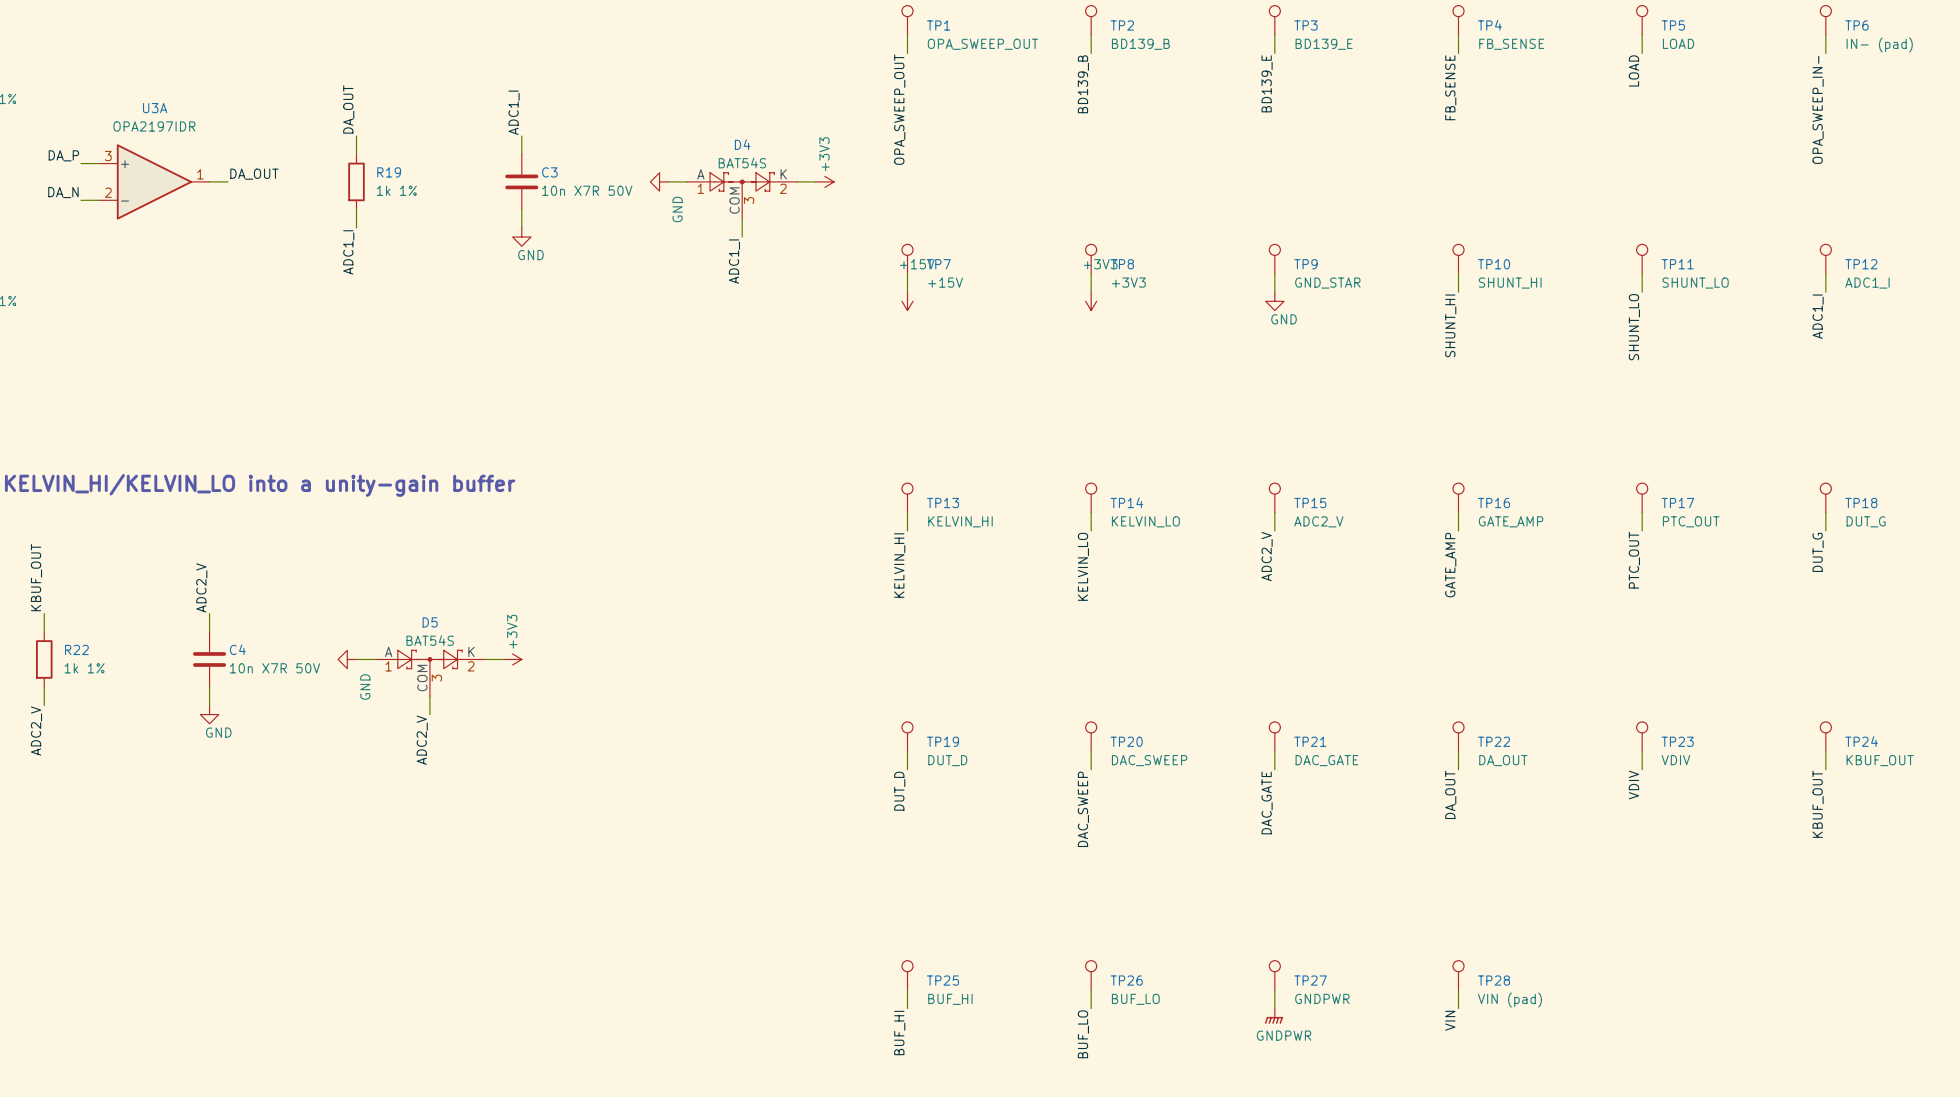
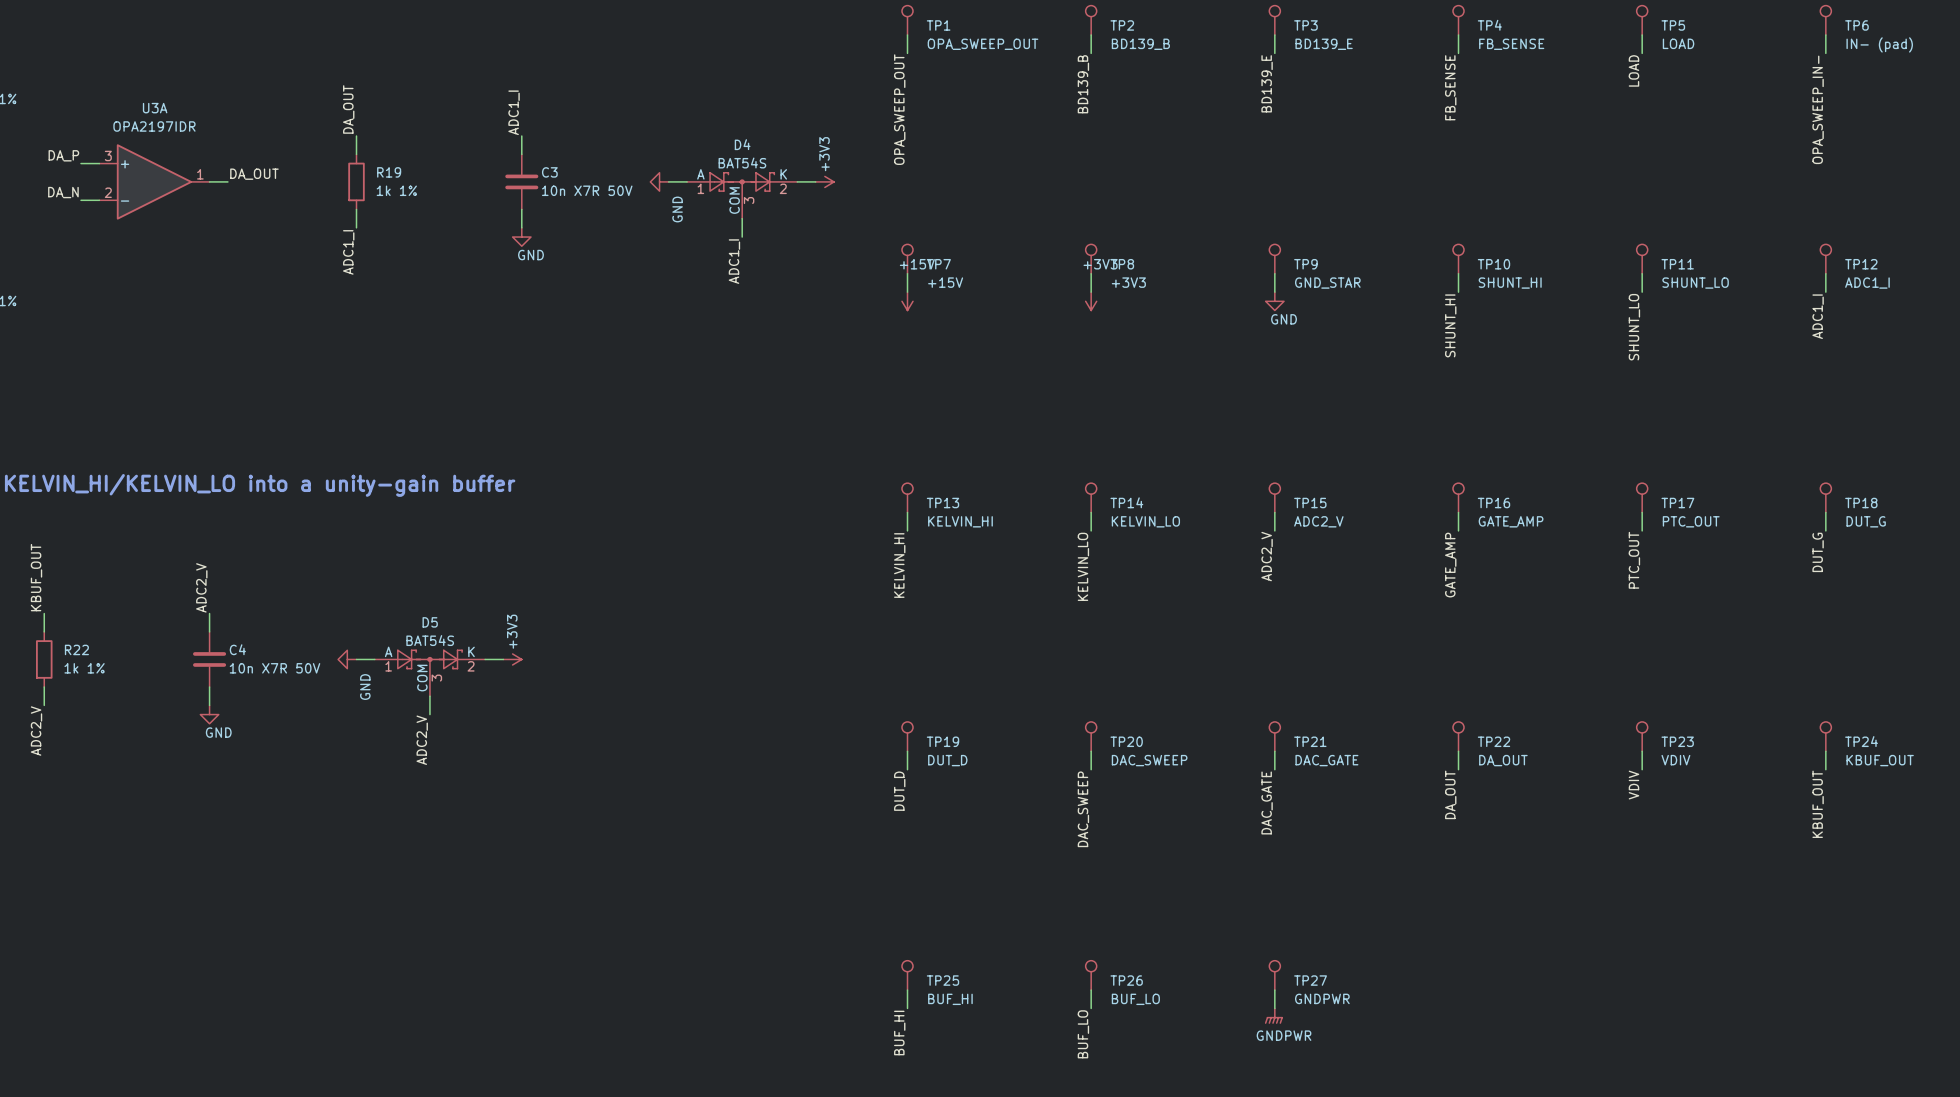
TP28: VIN (pad) (1458, 975) -> none
wire: (1458, 990) (1458, 1008) -> none
label: VIN (1450, 1020) -> none

